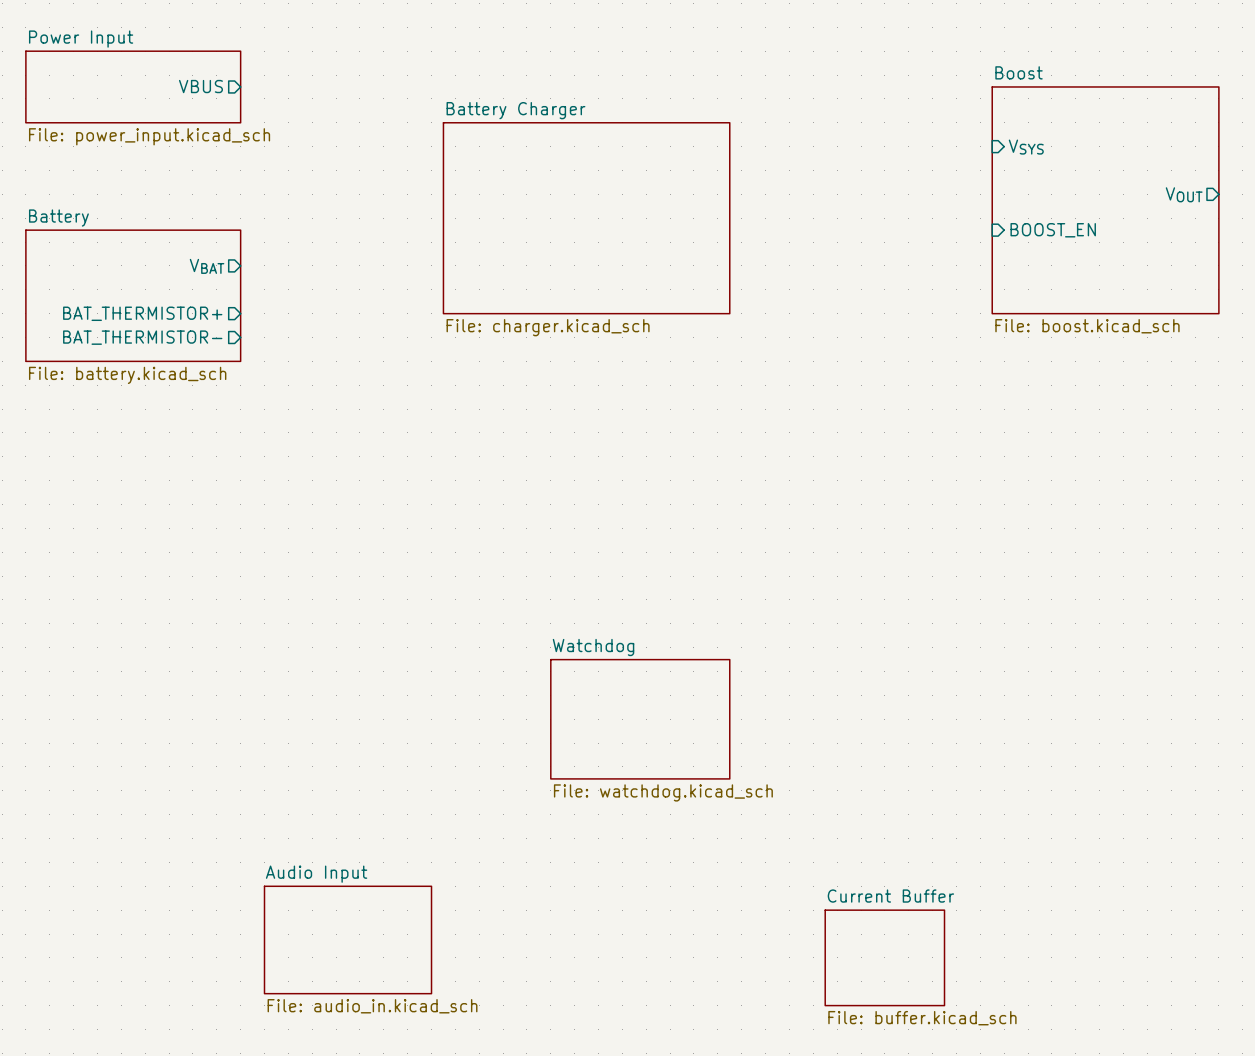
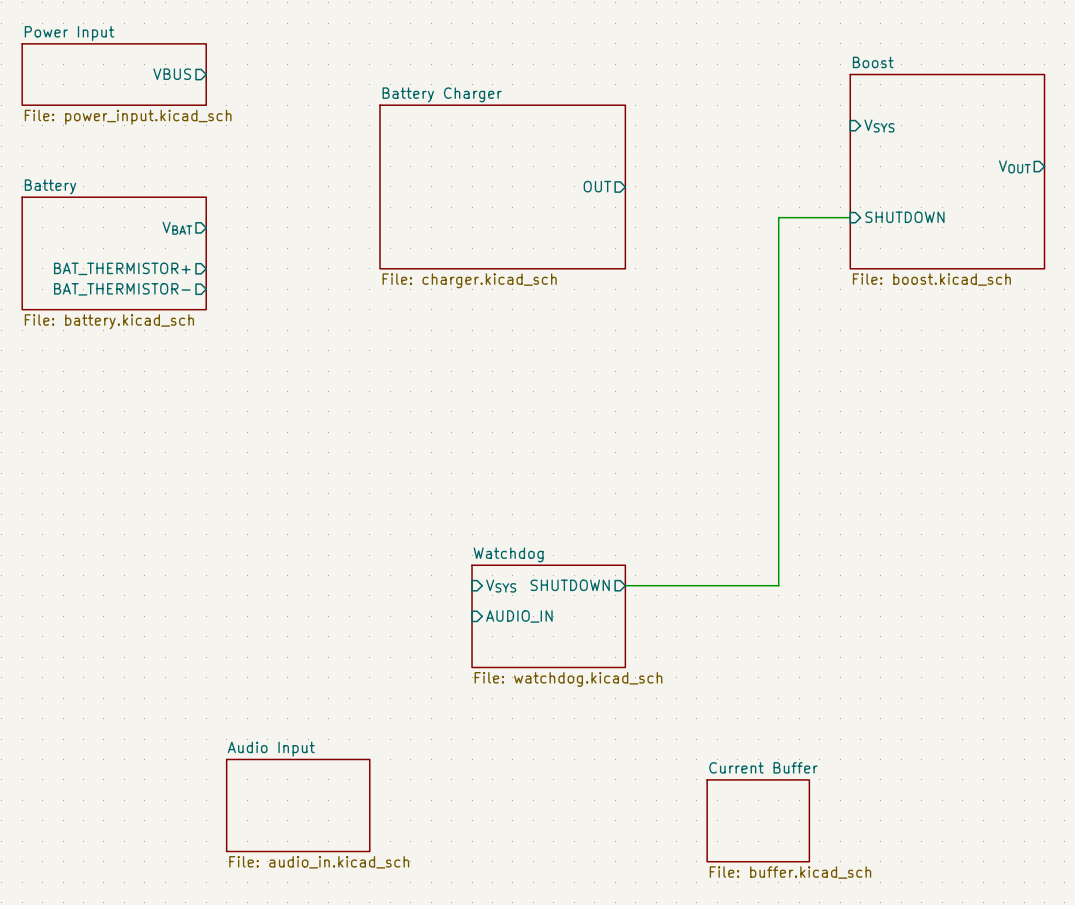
sheet pin: none -> OUT (597, 186)
sheet pin: BOOST_EN (1053, 230) -> none
sheet pin: none -> SHUTDOWN (904, 217)
wire: none -> (850, 217) (778, 217) (778, 585) (625, 585)
sheet pin: none -> VSYS (501, 586)
sheet pin: none -> SHUTDOWN (570, 585)
sheet pin: none -> AUDIO_IN (519, 616)

